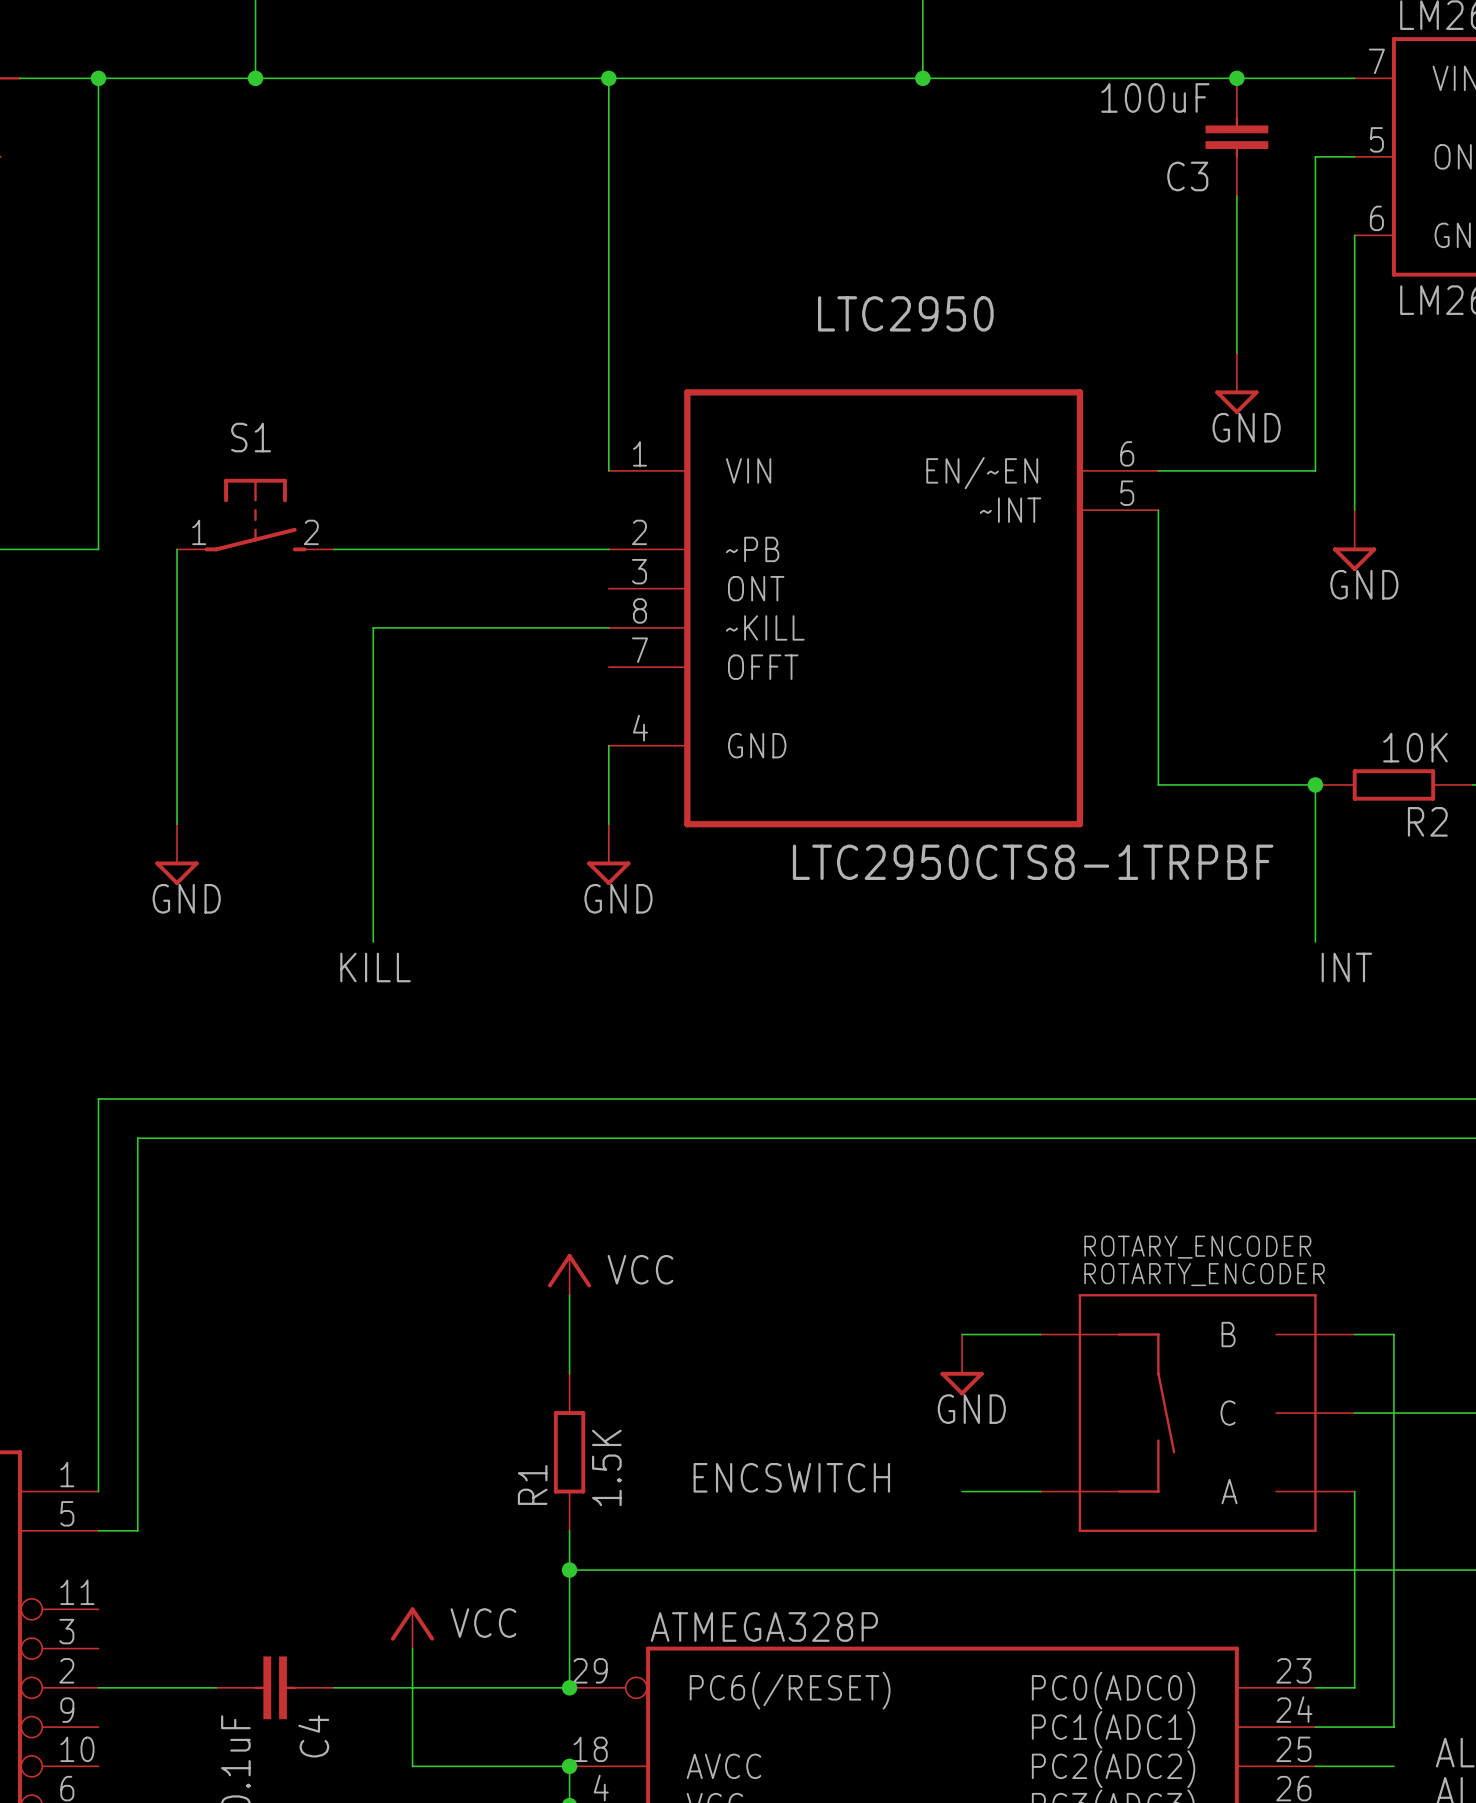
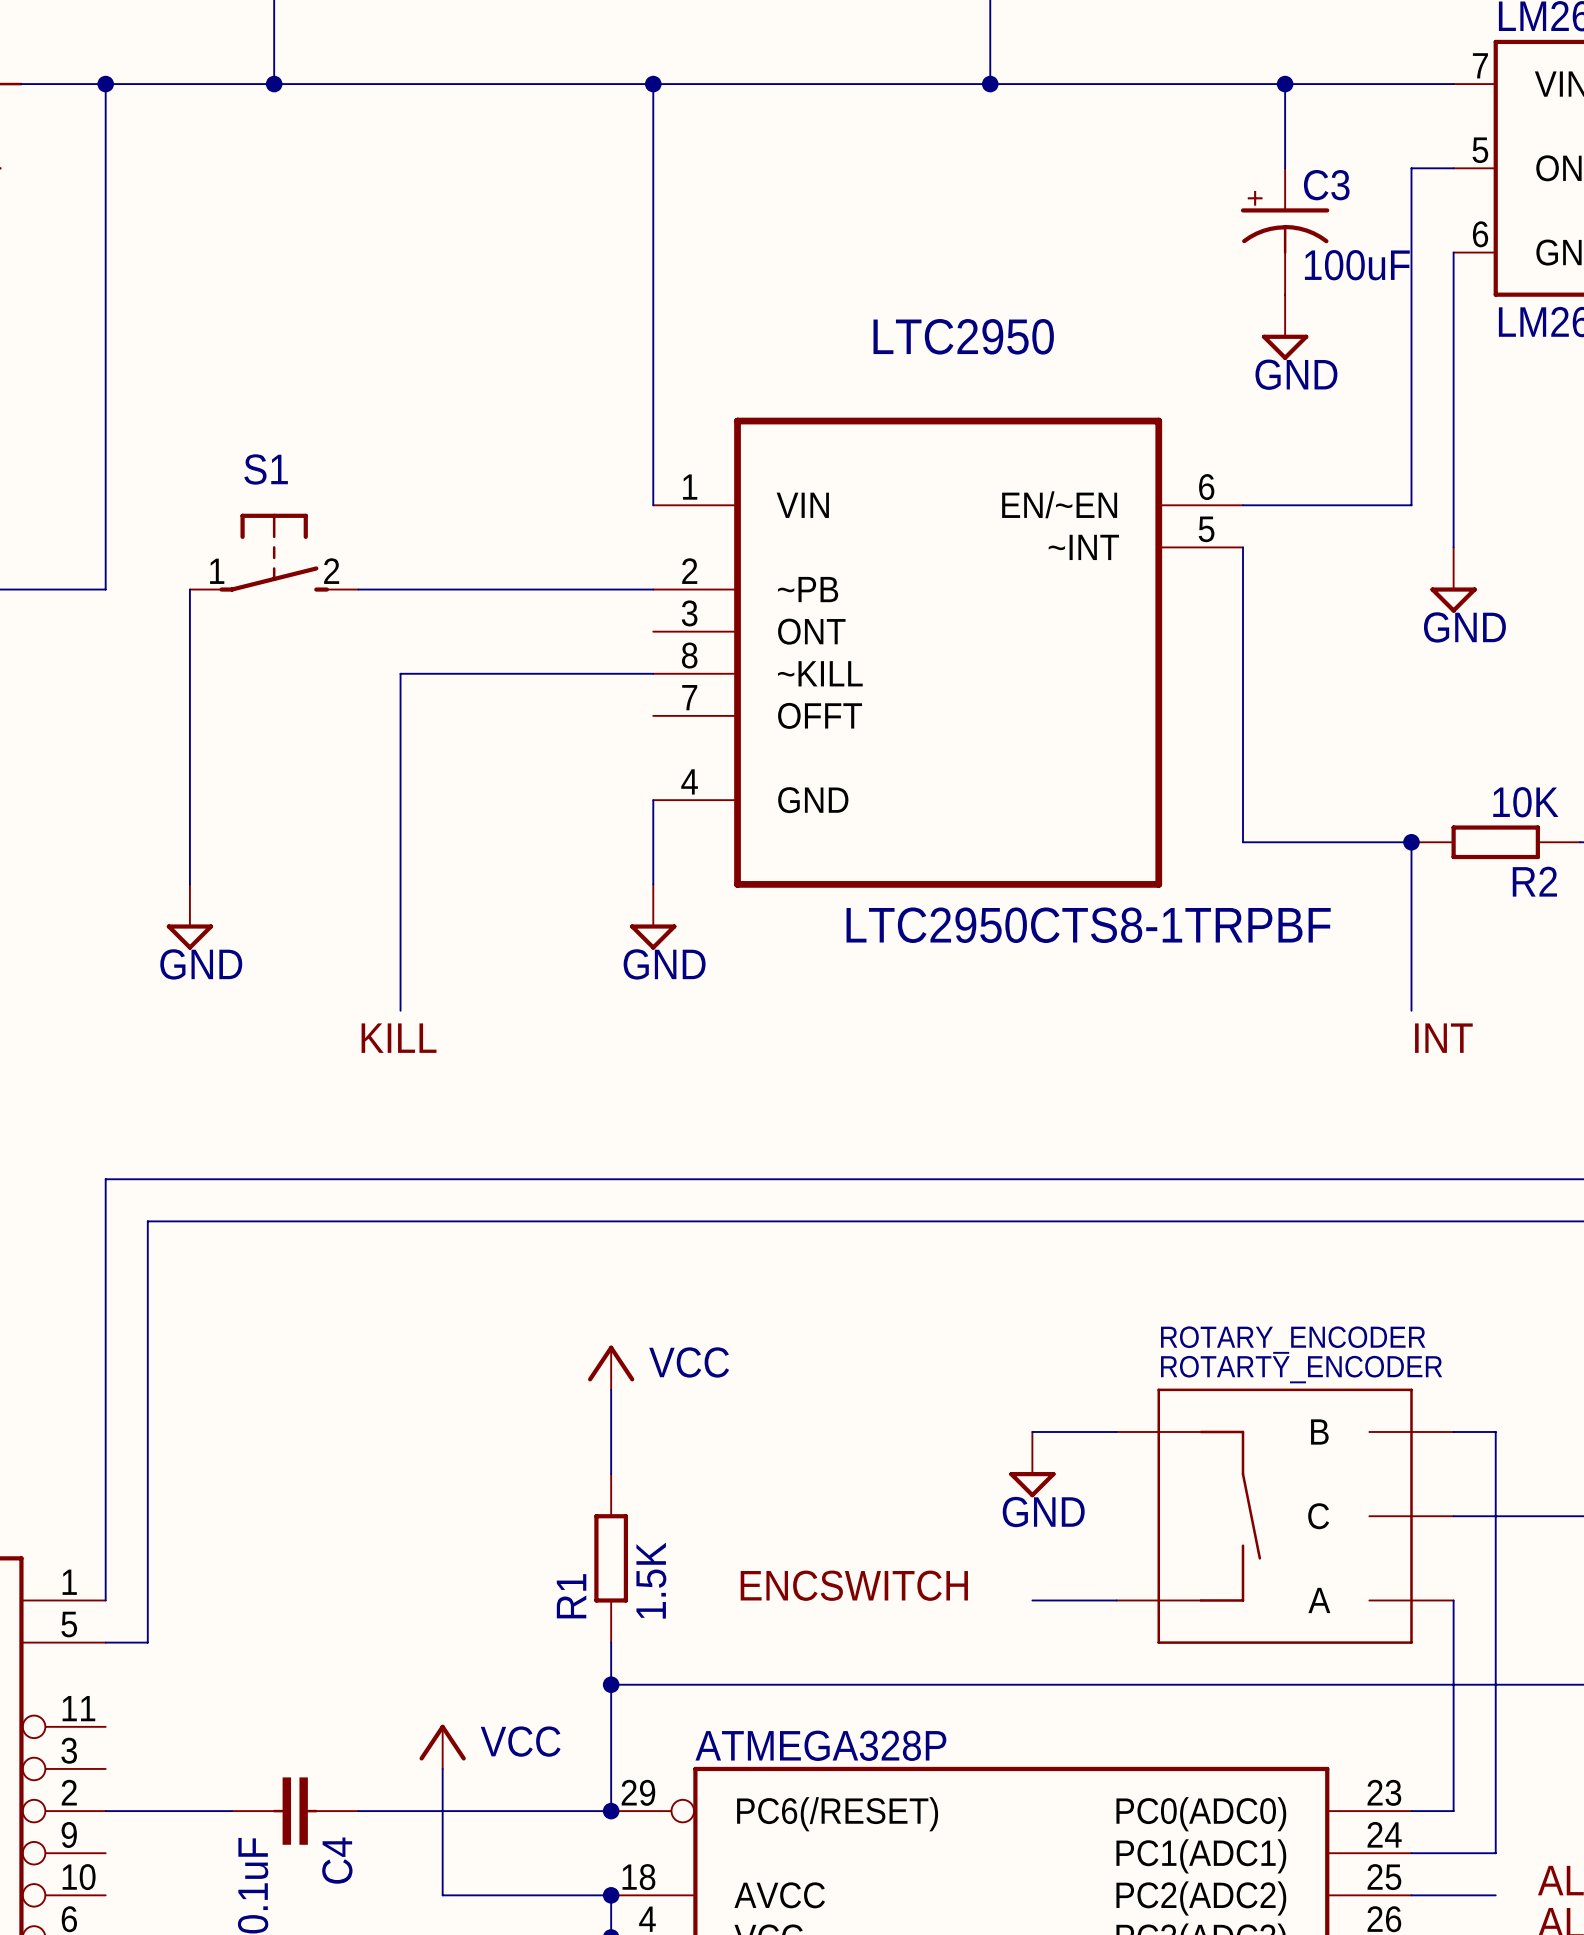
wire: none -> (1285, 84) (1285, 168)
C3 symbol: [1205, 78, 1269, 197] -> [1240, 168, 1330, 295]
junction position: (1236, 78) -> (1285, 84)
C3 value position: 100uF (1155, 97) -> 100uF (1357, 265)
C3 name position: C3 (1187, 176) -> C3 (1326, 185)
wire: (1236, 196) (1236, 353) -> none
power symbol position: GND (1236, 383) -> GND (1285, 327)

